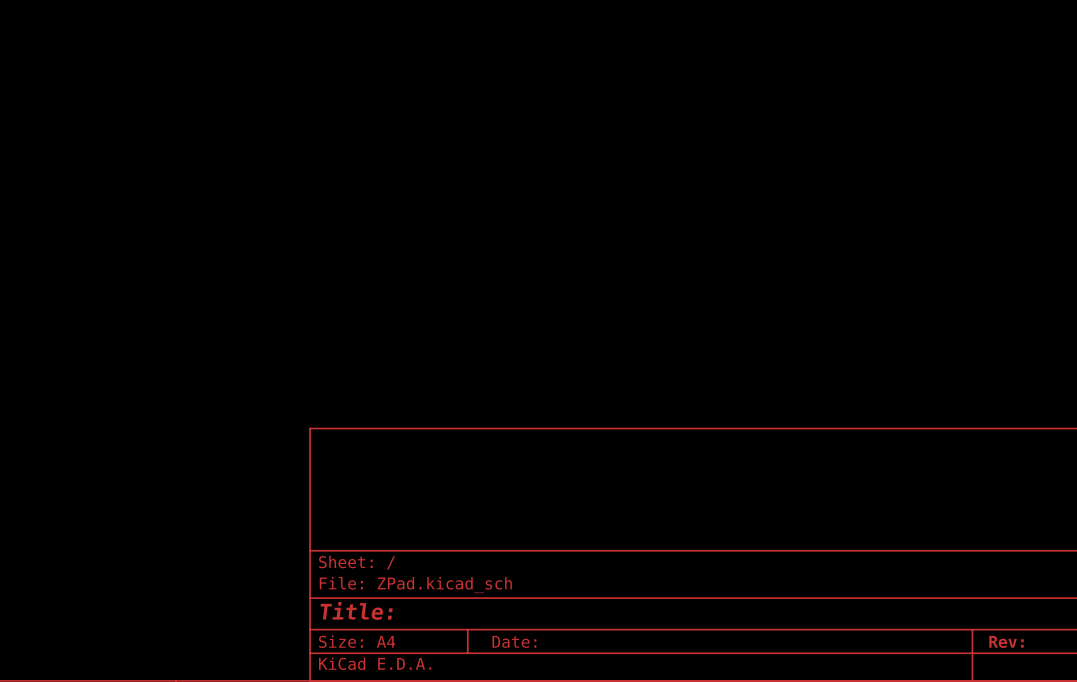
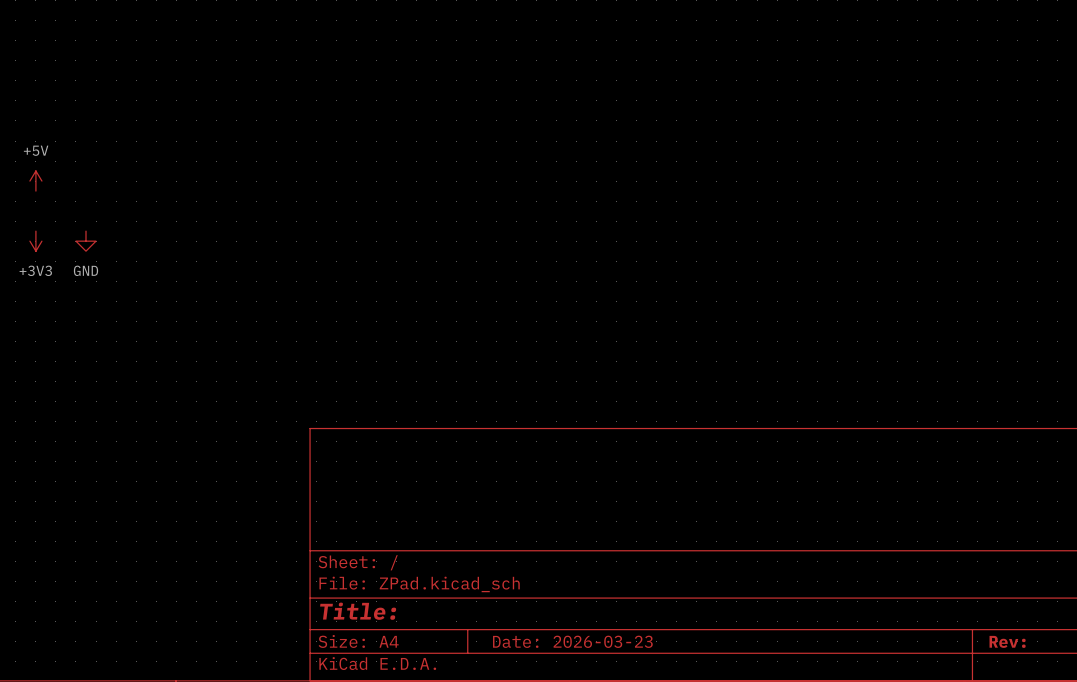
power symbol: none -> +5V (35, 181)
power symbol: none -> +3V3 (35, 241)
power symbol: none -> GND (86, 241)
title block: Date: (514, 641) -> Date: 2026-03-23 (572, 641)

